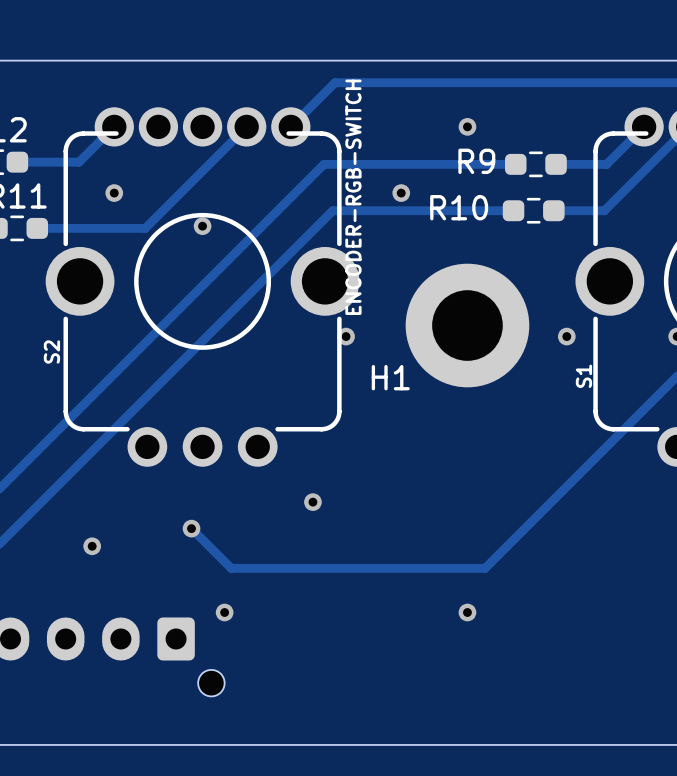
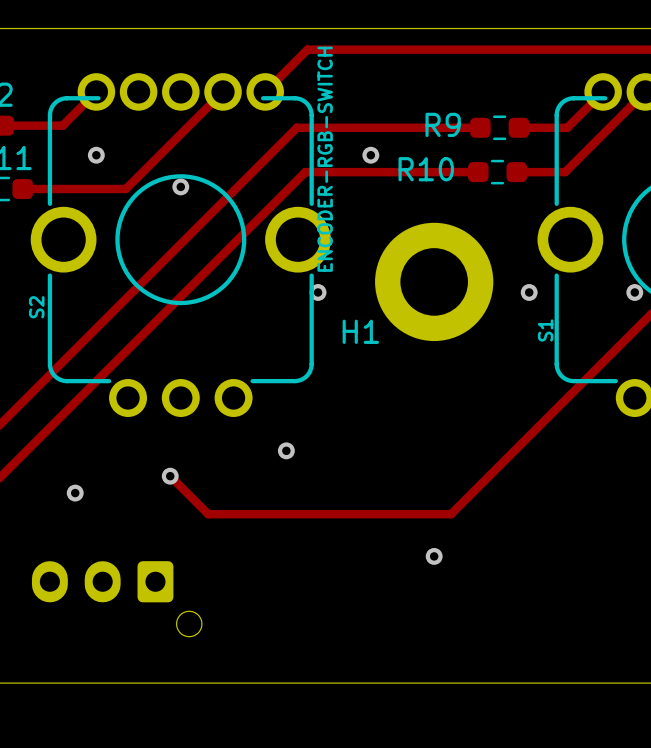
via: (467, 126) -> none
via: (224, 612) -> none

